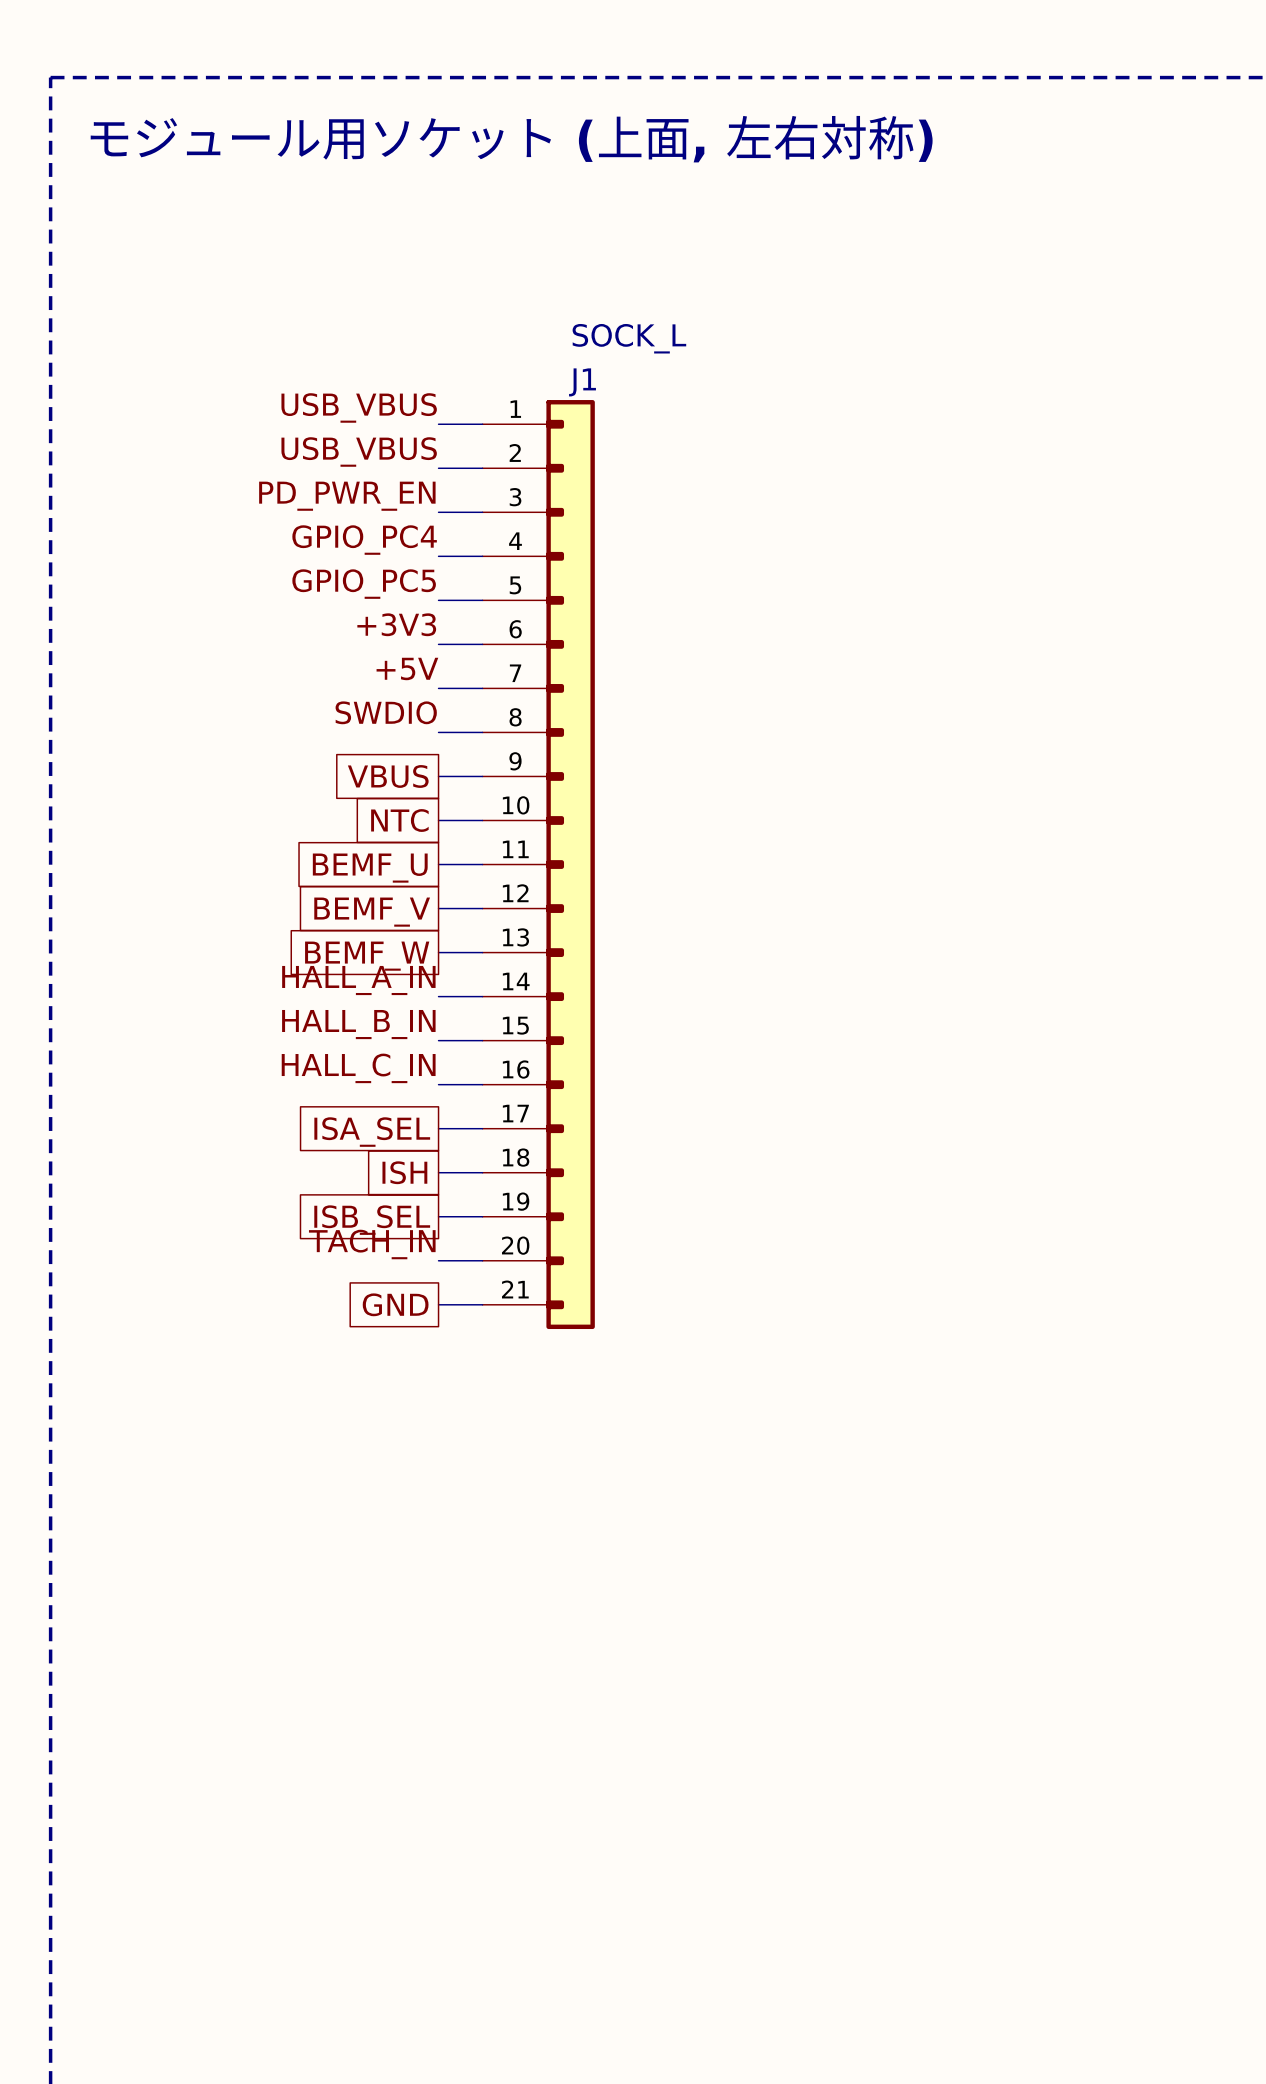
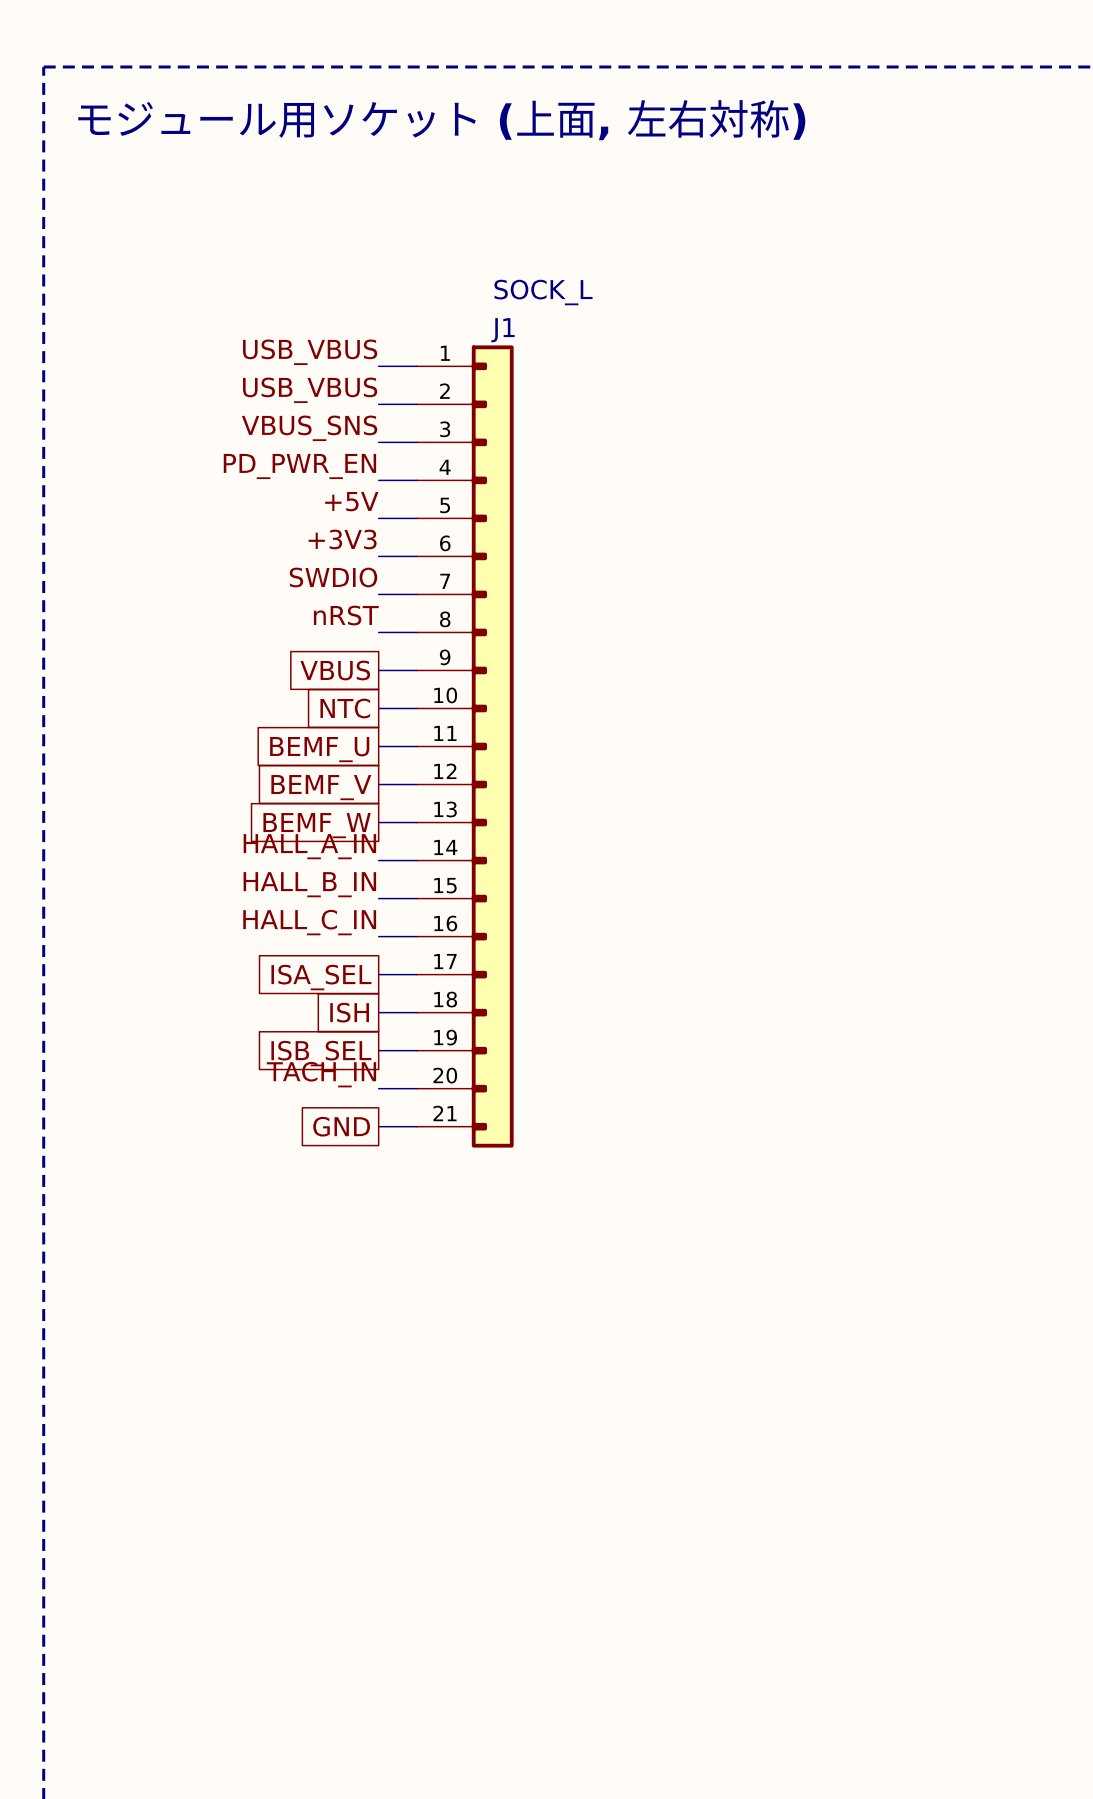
label: PD_PWR_EN (347, 496) -> VBUS_SNS (309, 428)
label: GPIO_PC4 (364, 540) -> PD_PWR_EN (299, 466)
label: GPIO_PC5 (364, 584) -> +5V (351, 501)
label: +5V (407, 668) -> SWDIO (333, 577)
label: SWDIO (386, 712) -> nRST (346, 615)

